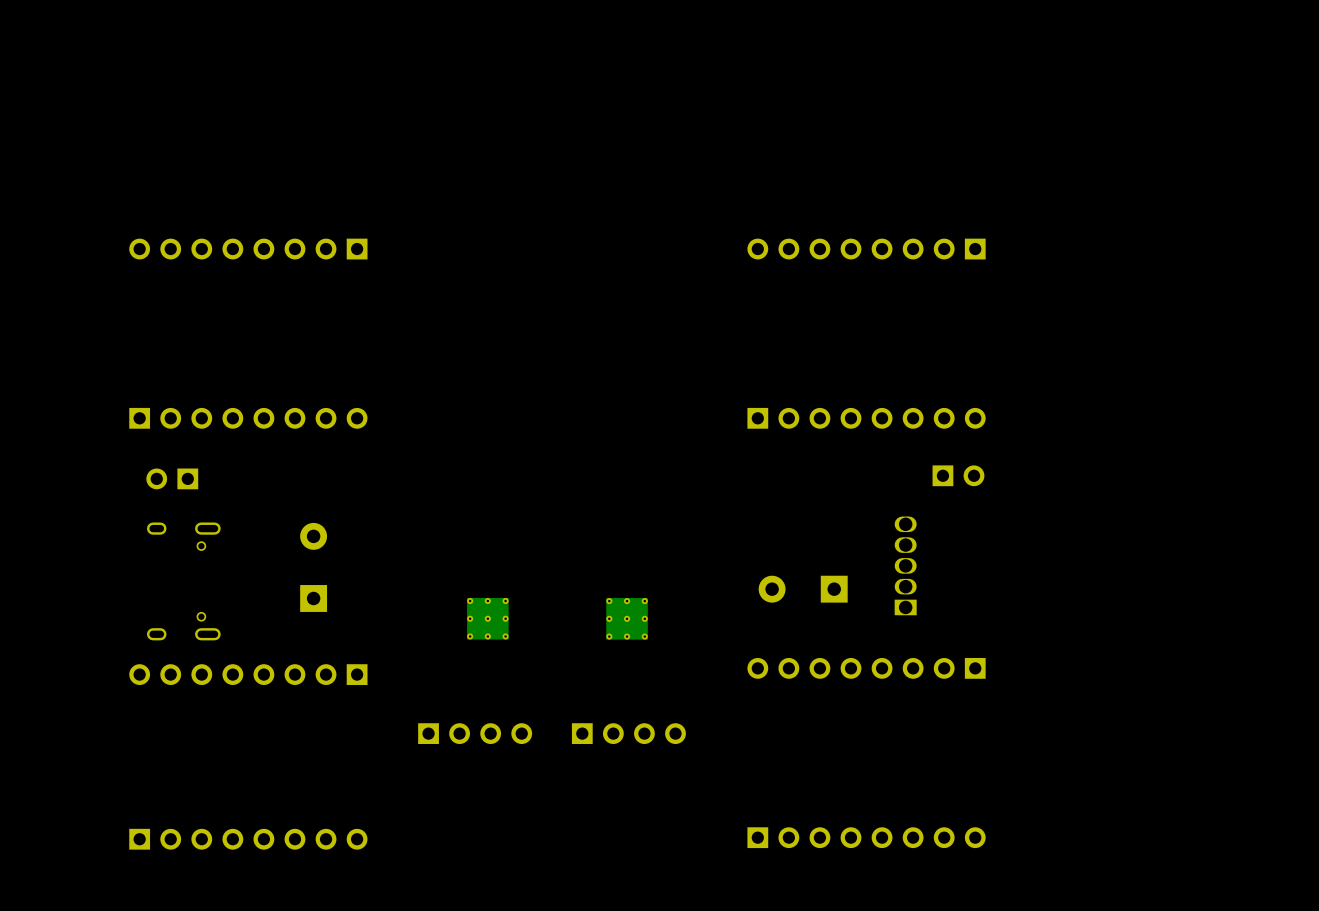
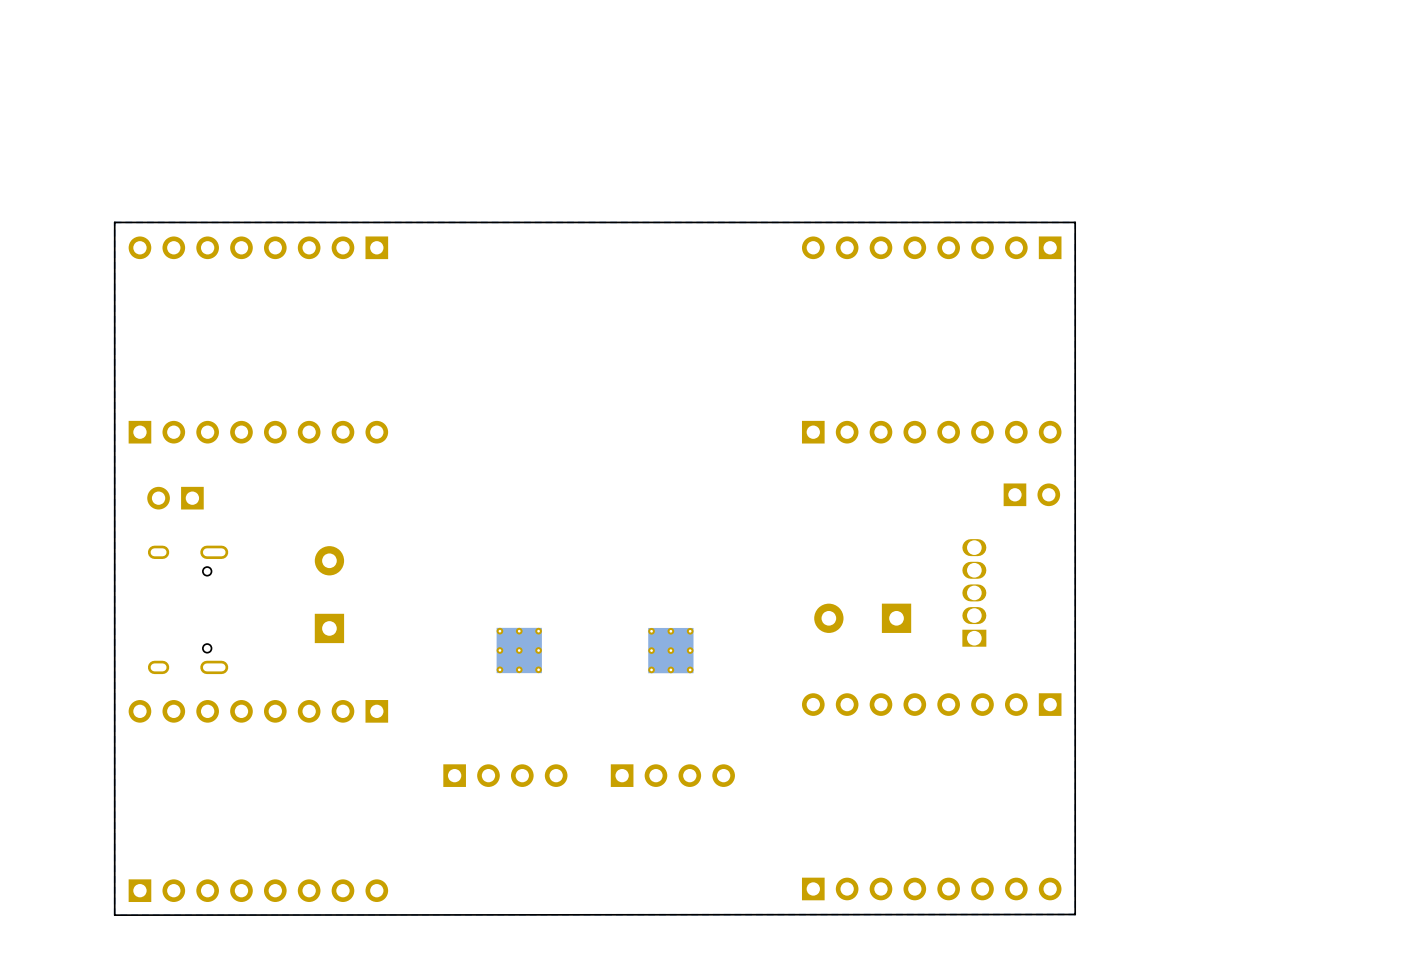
board edge: none -> (1075, 222) (114, 222) (114, 915) (1075, 914) (1075, 222)

